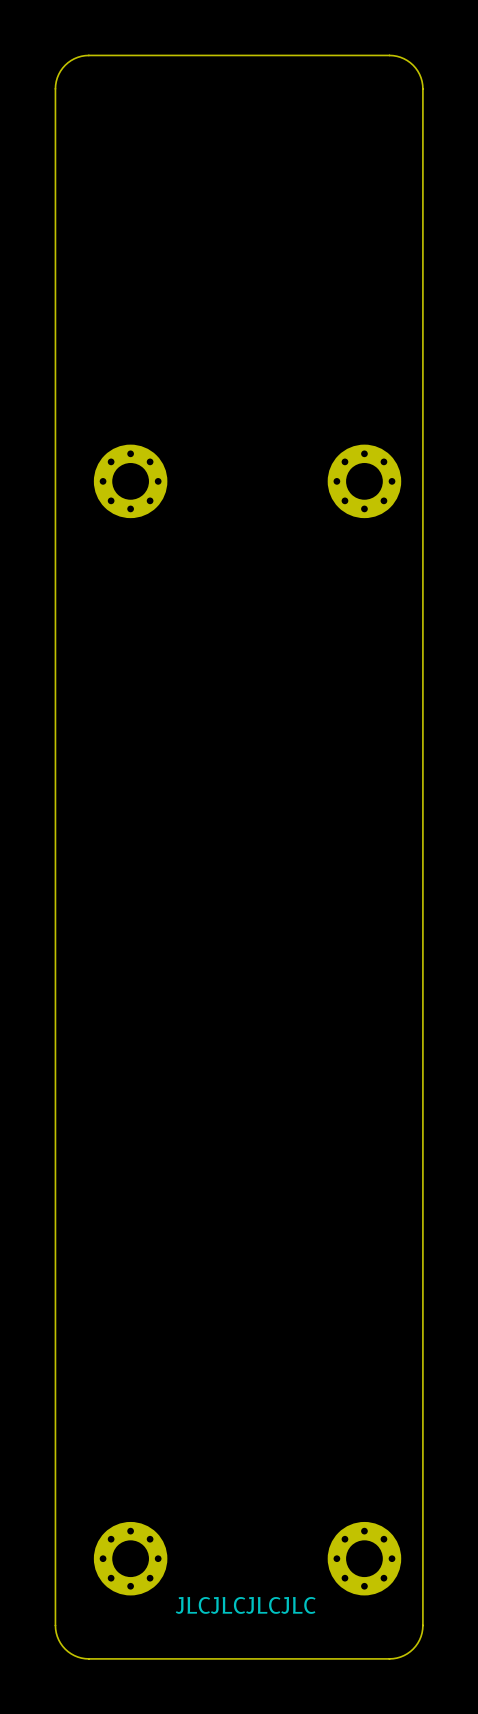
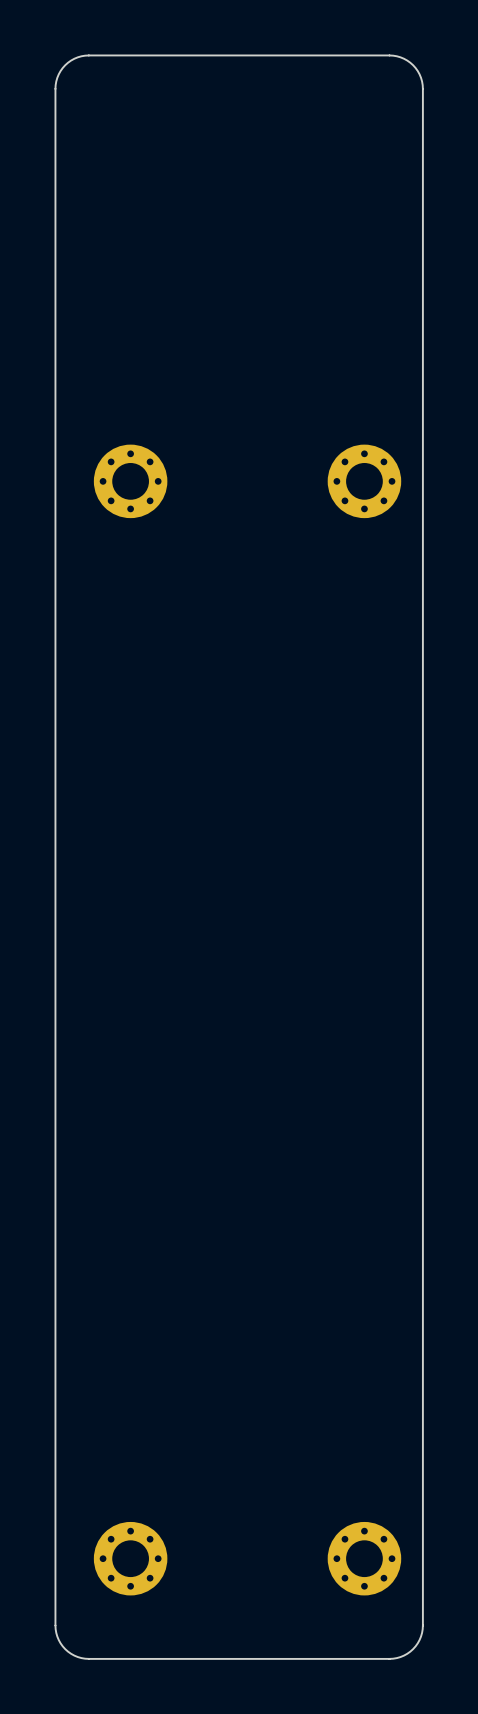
text: JLCJLCJLCJLC (245, 1605) -> none

